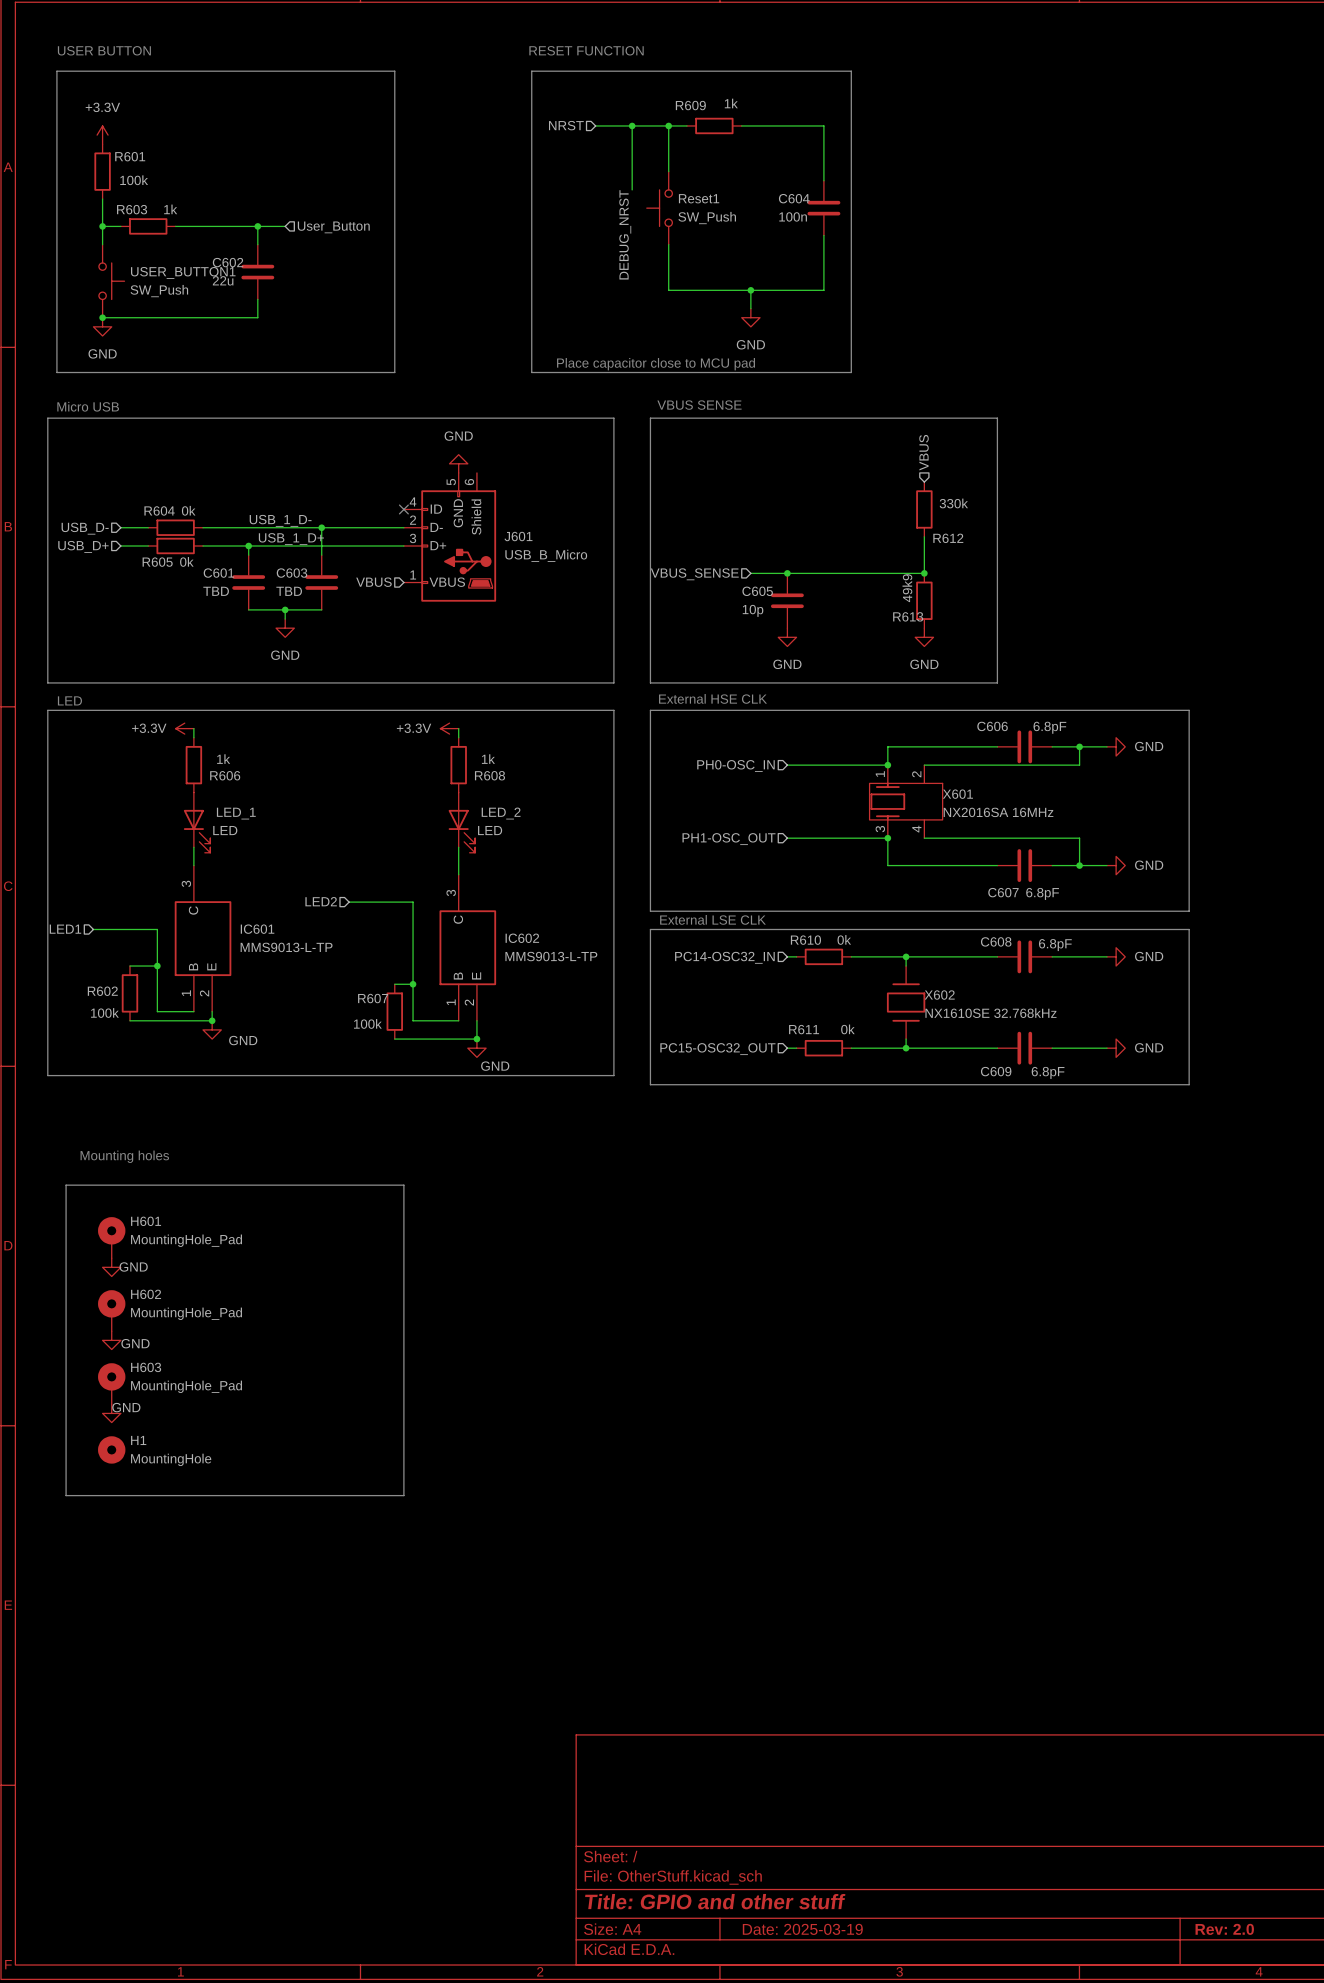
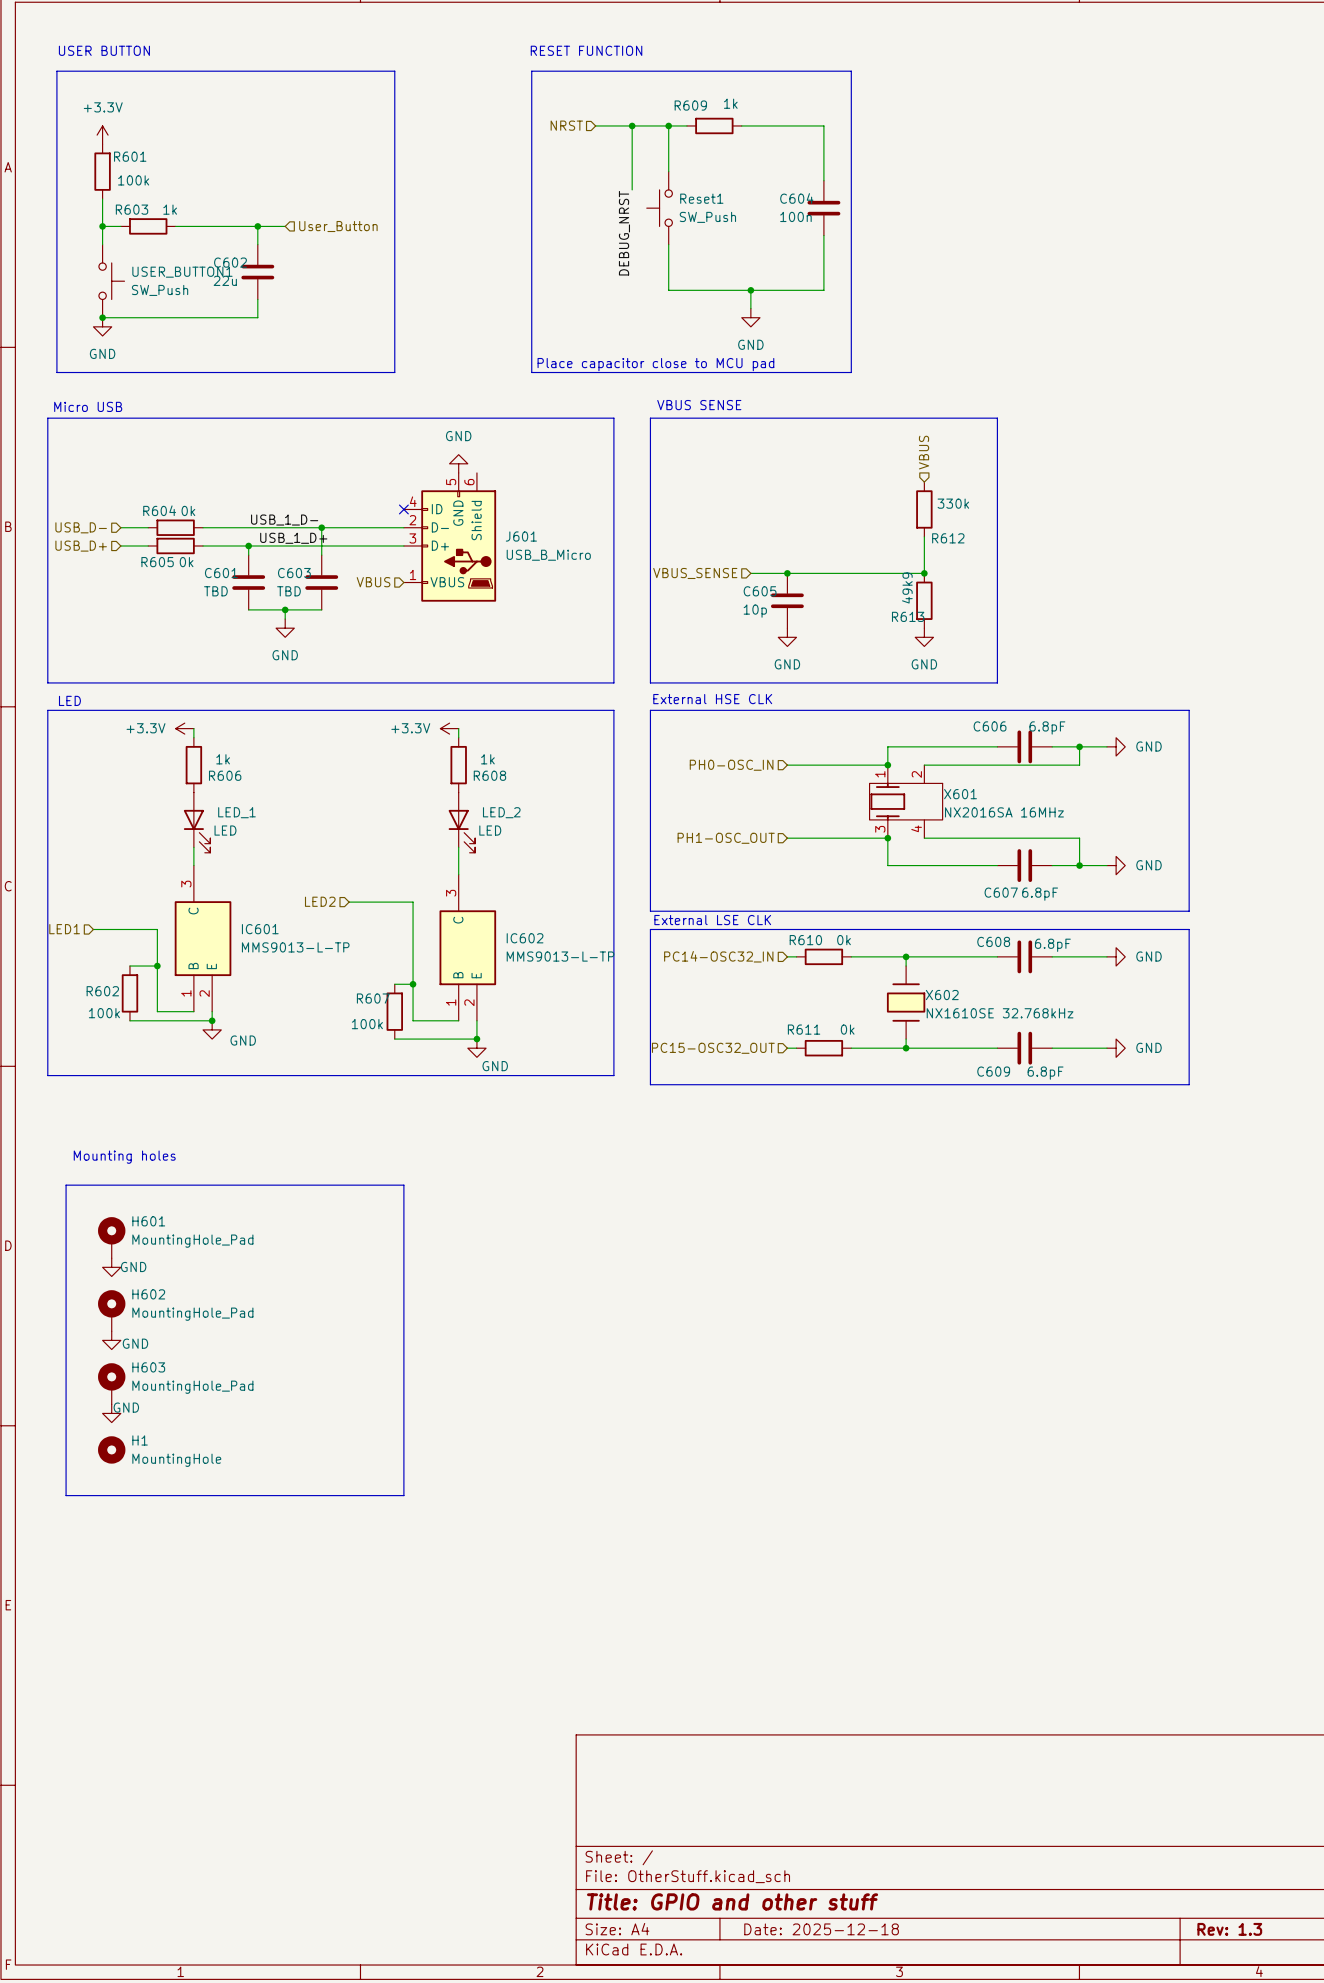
title block: Date: 2025-03-19 (802, 1929) -> Date: 2025-12-18 (821, 1929)
title block: Rev: 2.0 (1224, 1929) -> Rev: 1.3 (1229, 1929)

